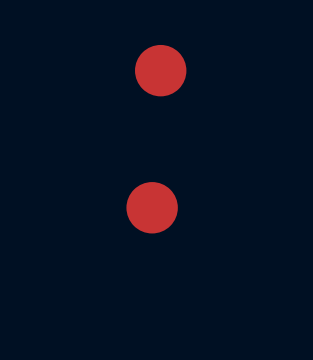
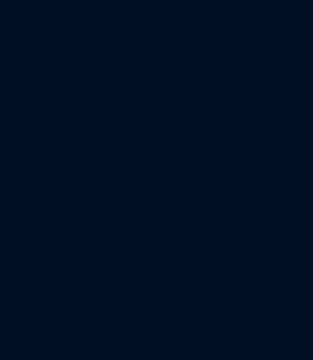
part: (160, 70) -> none
part: (152, 207) -> none

